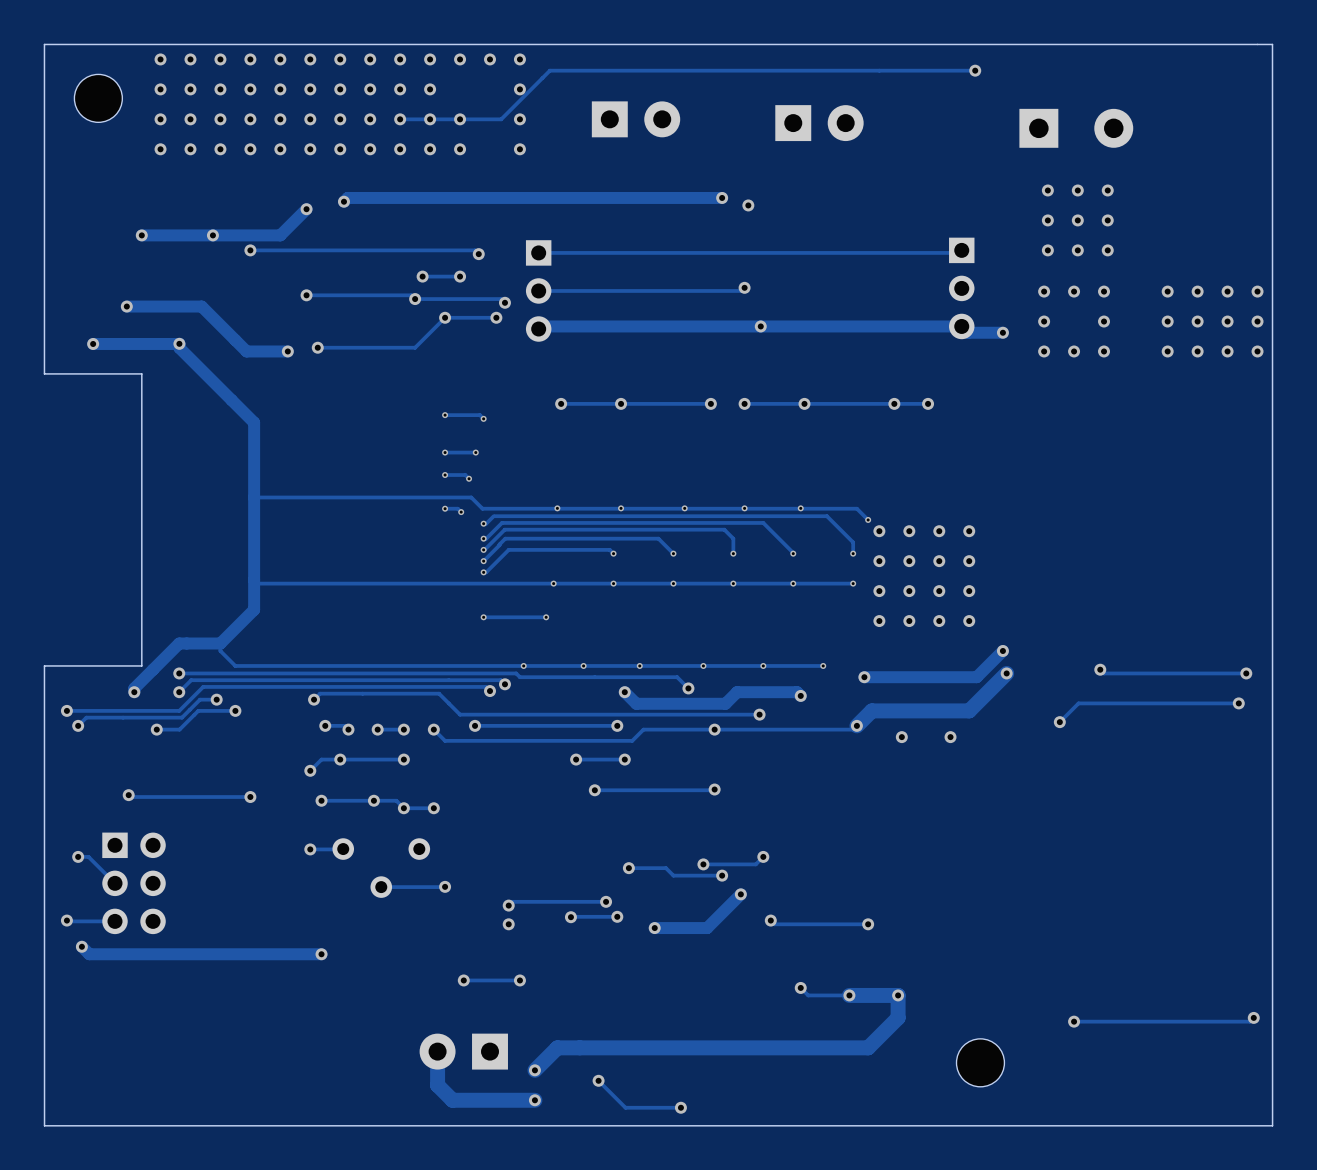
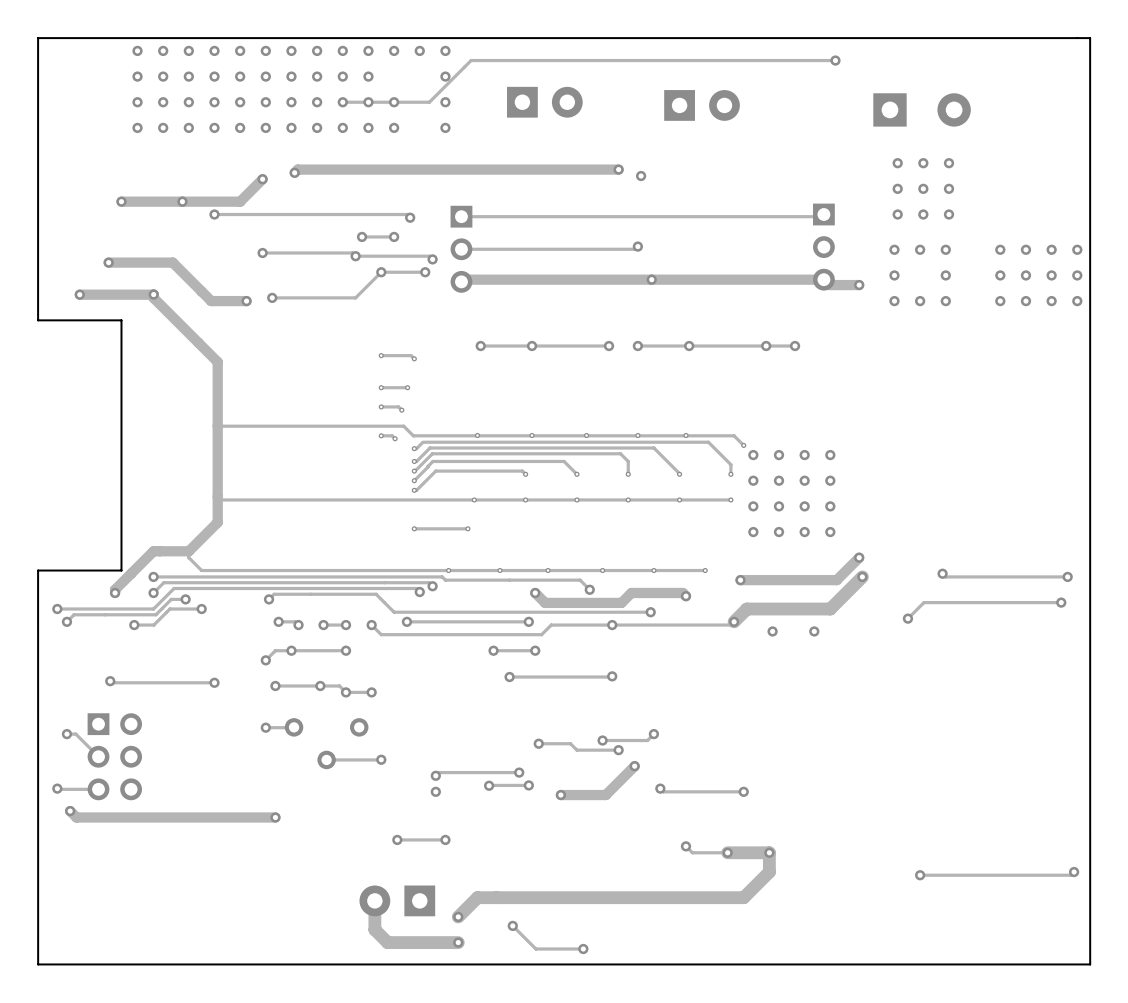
part: (98, 98) -> none
part: (980, 1062) -> none

